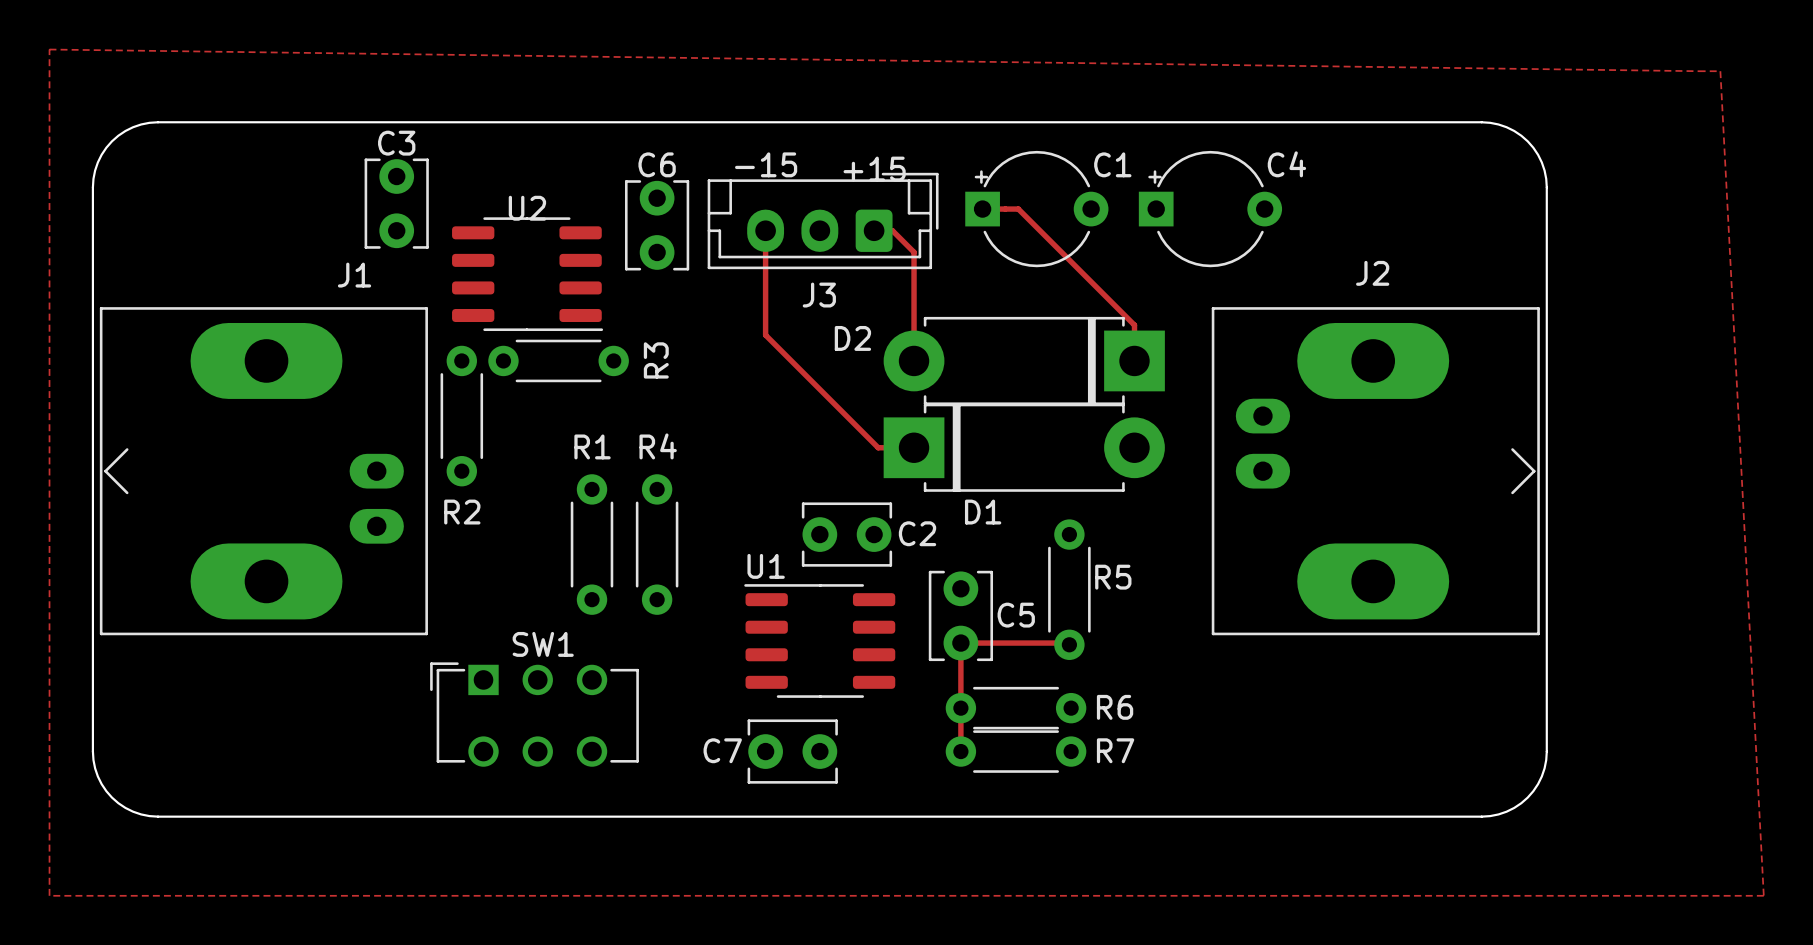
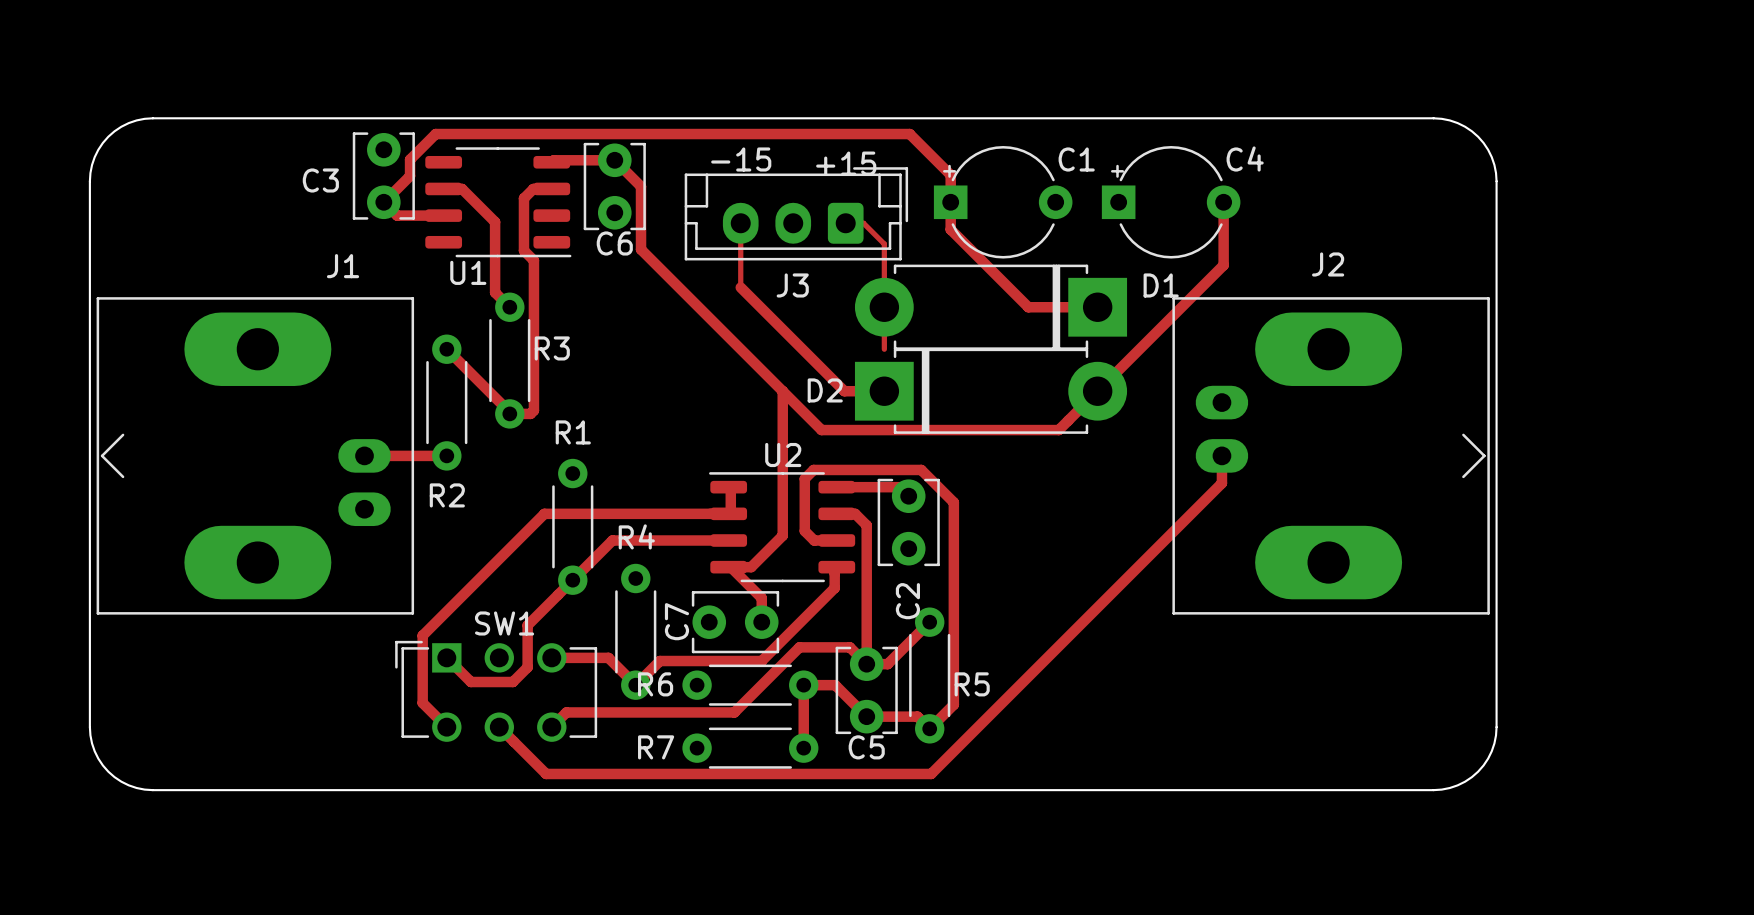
zone outline: (49, 49) (49, 895) (1763, 895) (1720, 71) (49, 49) -> none
C3 name position: C3 (396, 143) -> C3 (320, 180)
C6 name position: C6 (657, 164) -> C6 (614, 243)
track: none -> (551, 162) (553, 160) (614, 160) (641, 186) (641, 249) (821, 430) (1058, 430) (1223, 265) (1223, 202)
track: none -> (443, 188) (462, 188) (495, 222) (495, 292) (509, 307)
track: none -> (551, 188) (533, 188) (523, 198) (523, 250) (533, 260) (533, 410) (530, 413) (509, 413) (446, 349)
C3 position: (396, 203) -> (383, 176)
track: (982, 209) (1018, 209) (1134, 325) (1134, 360) -> none
U2 footprint: [452, 217, 604, 332] -> [709, 472, 856, 583]
track: none -> (443, 215) (397, 215) (383, 202) (410, 176) (410, 159) (435, 134) (909, 134) (950, 174) (950, 229) (1028, 307) (1097, 307)
C6 position: (657, 225) -> (614, 186)
track: (765, 297) (765, 335) (878, 447) (914, 447) -> (740, 287) (844, 391) (884, 391)
D2 name position: D2 (852, 338) -> D2 (825, 390)
R3 rotation: 0° (558, 360) -> 90° clockwise (509, 360)
R3 name position: R3 (656, 360) -> R3 (552, 348)
D1 position: (1024, 360) -> (991, 307)
track: none -> (782, 391) (782, 535) (751, 567) (730, 567) (761, 598) (761, 622)
D2 position: (1024, 447) -> (991, 391)
track: none -> (364, 455) (446, 455)
track: none -> (1221, 455) (1221, 483) (931, 773) (546, 773) (499, 727)
track: none -> (730, 487) (730, 513) (544, 513) (422, 635) (422, 703) (446, 727)
track: none -> (834, 487) (899, 487) (908, 496)
D1 name position: D1 (983, 512) -> D1 (1161, 285)
track: none -> (834, 513) (855, 513) (866, 525) (866, 664)
C2 rotation: 0° (846, 534) -> 90° clockwise (908, 522)
C2 position: (846, 534) -> (908, 522)
R4 position: (657, 544) -> (635, 631)
track: none -> (730, 540) (612, 540) (527, 625) (527, 667) (512, 682) (470, 682) (446, 657)
track: none -> (834, 540) (814, 540) (804, 531) (804, 478) (813, 469) (921, 469) (953, 502) (953, 704) (929, 728) (917, 716) (866, 716) (835, 685) (803, 685) (803, 748)
U1 name position: U1 (766, 566) -> U1 (468, 272)
R5 name position: R5 (1113, 577) -> R5 (972, 684)
U1 footprint: [744, 584, 896, 698] -> [425, 147, 572, 258]
track: none -> (834, 567) (834, 588) (761, 661) (659, 661) (635, 685) (608, 657) (551, 657)
R5 position: (1069, 589) -> (929, 675)
C5 position: (960, 615) -> (866, 690)
C5 name position: C5 (1016, 615) -> C5 (866, 747)
track: none -> (929, 622) (887, 664) (866, 664)
track: (1069, 644) (1067, 643) (960, 643) (960, 751) -> none
track: none -> (866, 664) (849, 647) (799, 647) (734, 712) (566, 712) (551, 727)
R6 name position: R6 (1115, 707) -> R6 (655, 684)
R6 position: (1016, 708) -> (750, 685)
SW1 position: (534, 714) -> (496, 691)
C7 name rotation: 0° (722, 750) -> 90° counterclockwise (676, 621)
R7 name position: R7 (1115, 750) -> R7 (656, 747)
C7 position: (792, 751) -> (735, 622)
R7 position: (1016, 751) -> (750, 748)

